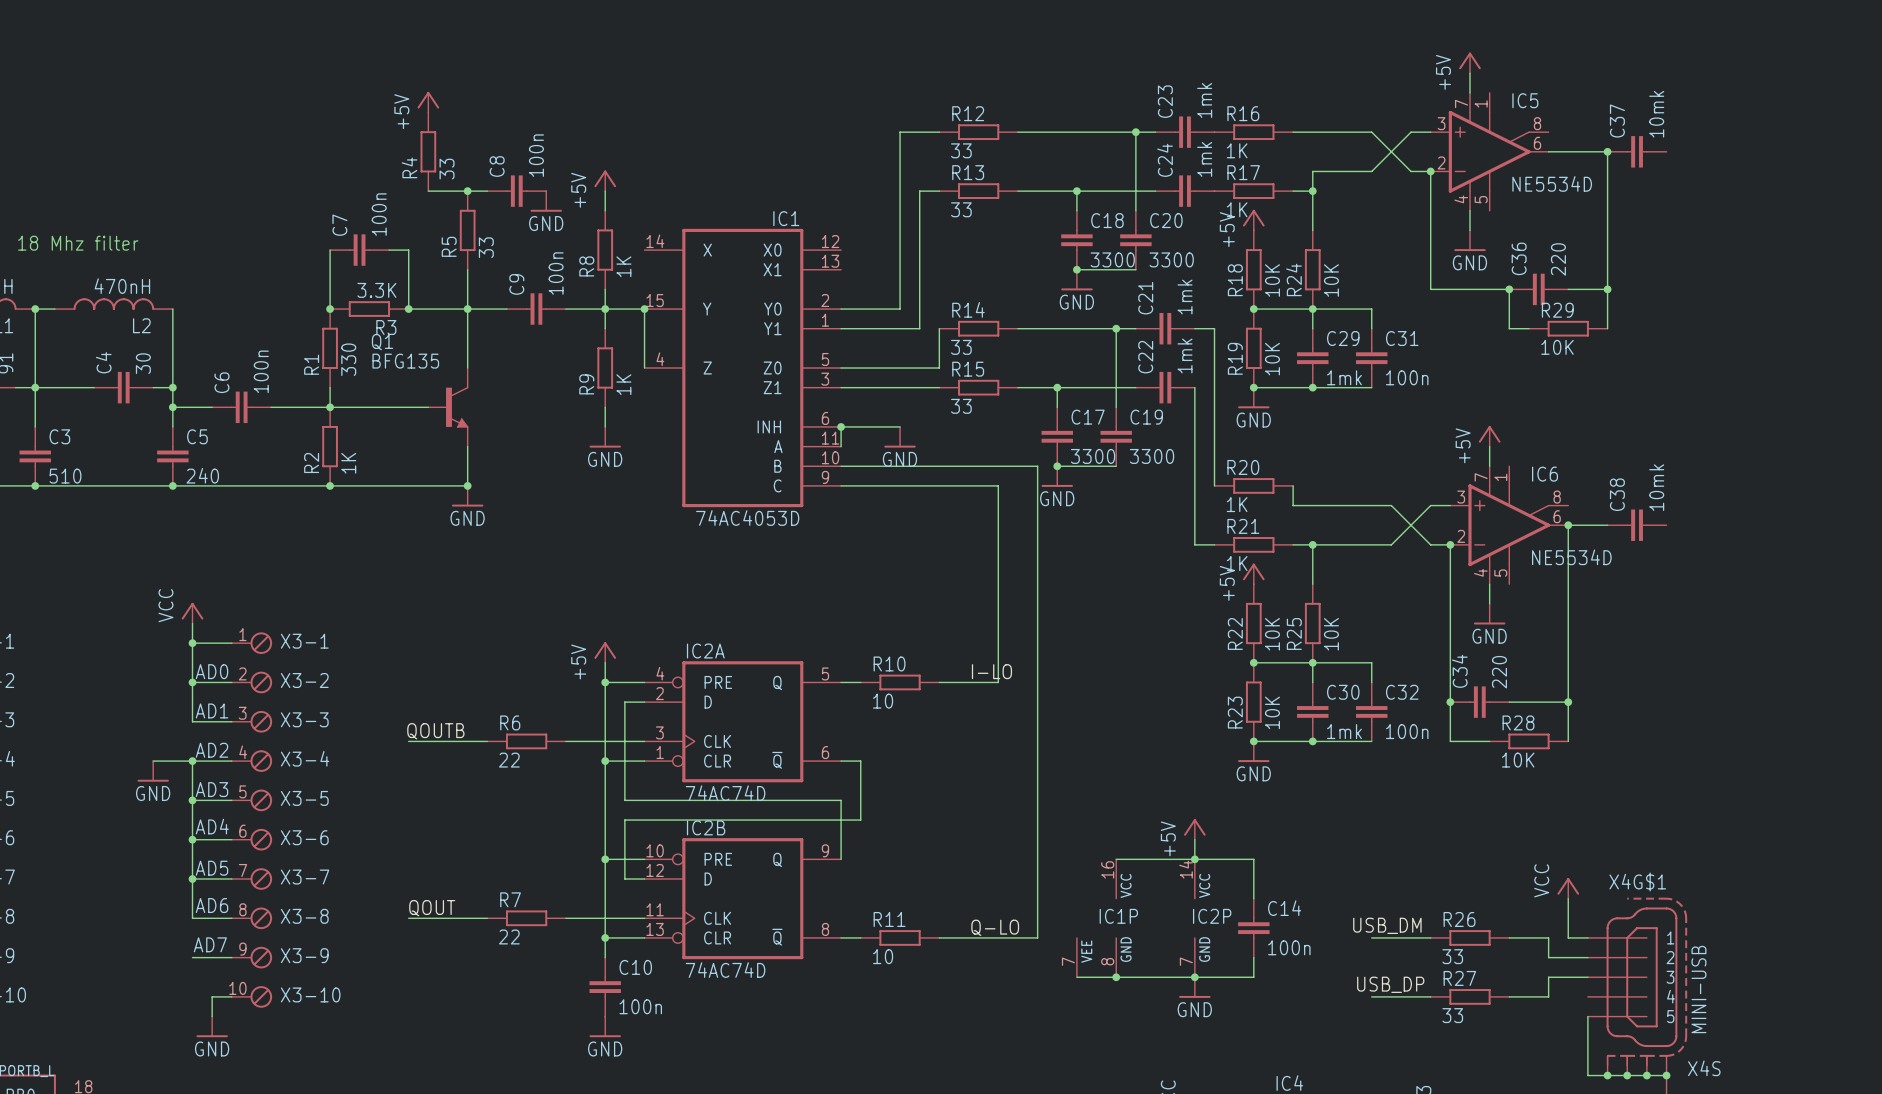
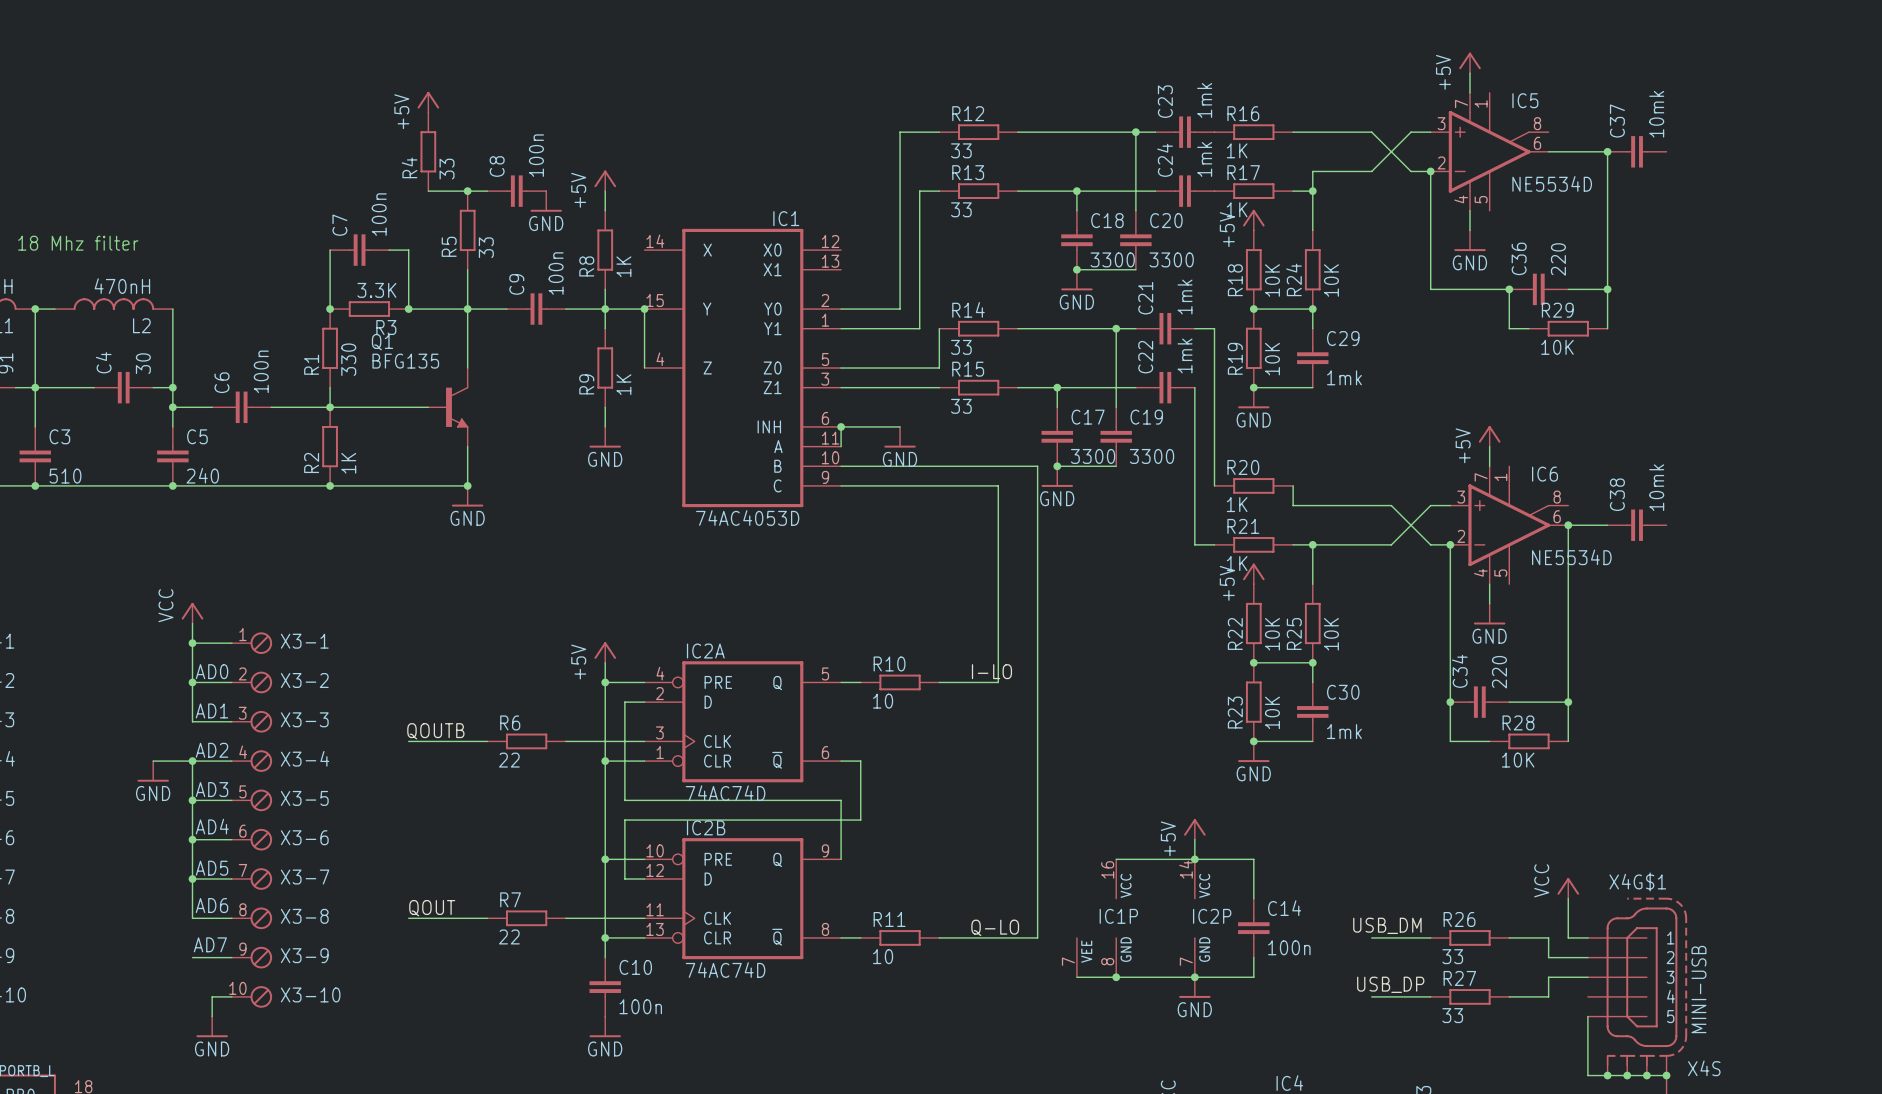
wire: (1312, 309) (1371, 309) (1371, 328) -> none
C31: 100n (1371, 358) -> none
wire: (1312, 387) (1371, 387) -> none
junction: (1312, 387) -> none
wire: (1312, 662) (1371, 662) (1371, 682) -> none
C32: 100n (1371, 711) -> none
wire: (1312, 741) (1371, 741) -> none
junction: (1312, 741) -> none

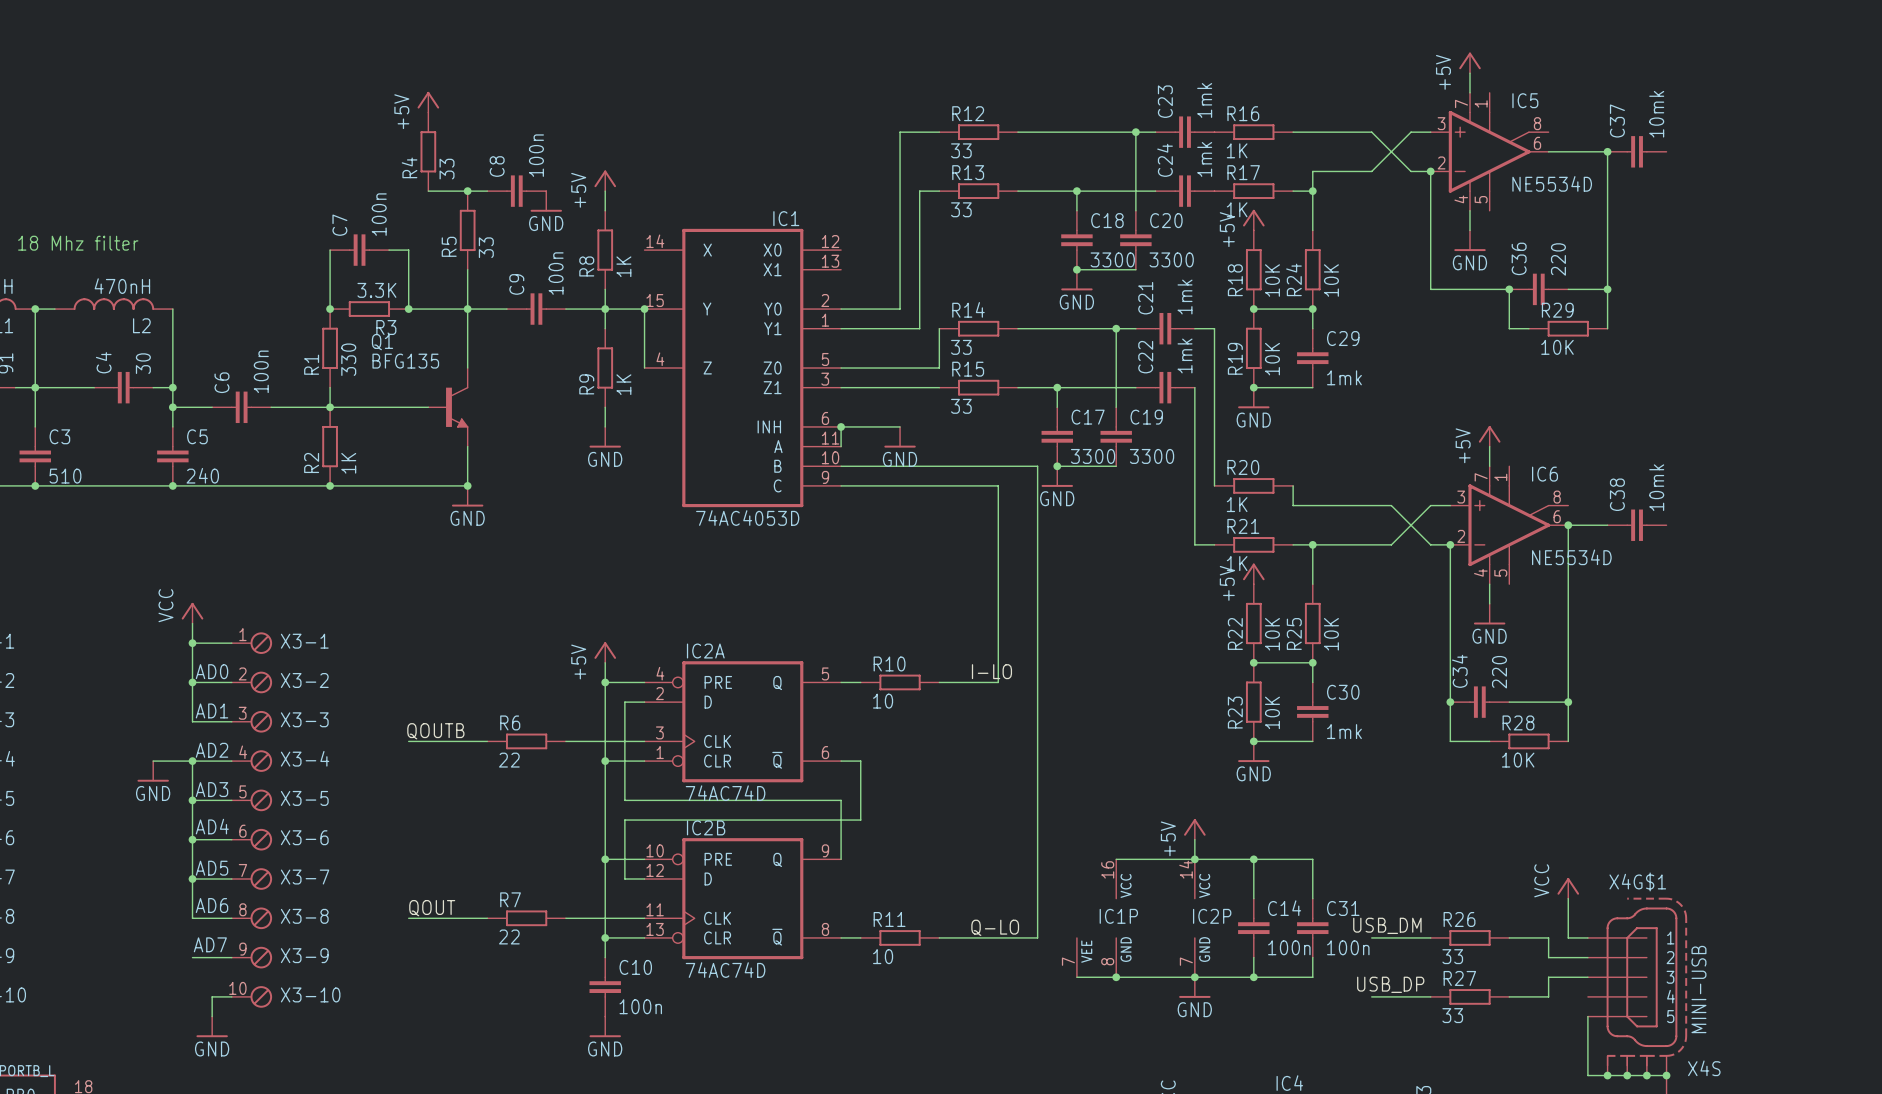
wire: none -> (1253, 859) (1312, 859) (1312, 898)
junction: none -> (1253, 859)
C31: none -> 100n (1312, 928)
wire: none -> (1312, 957) (1312, 977) (1253, 977)
junction: none -> (1253, 977)

